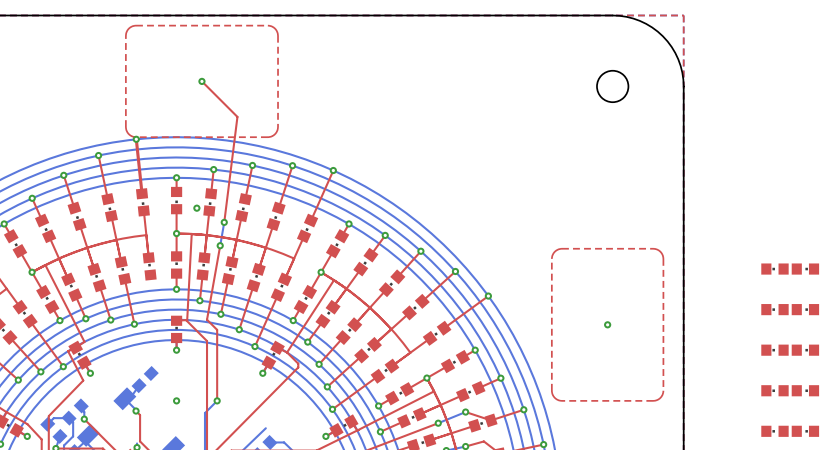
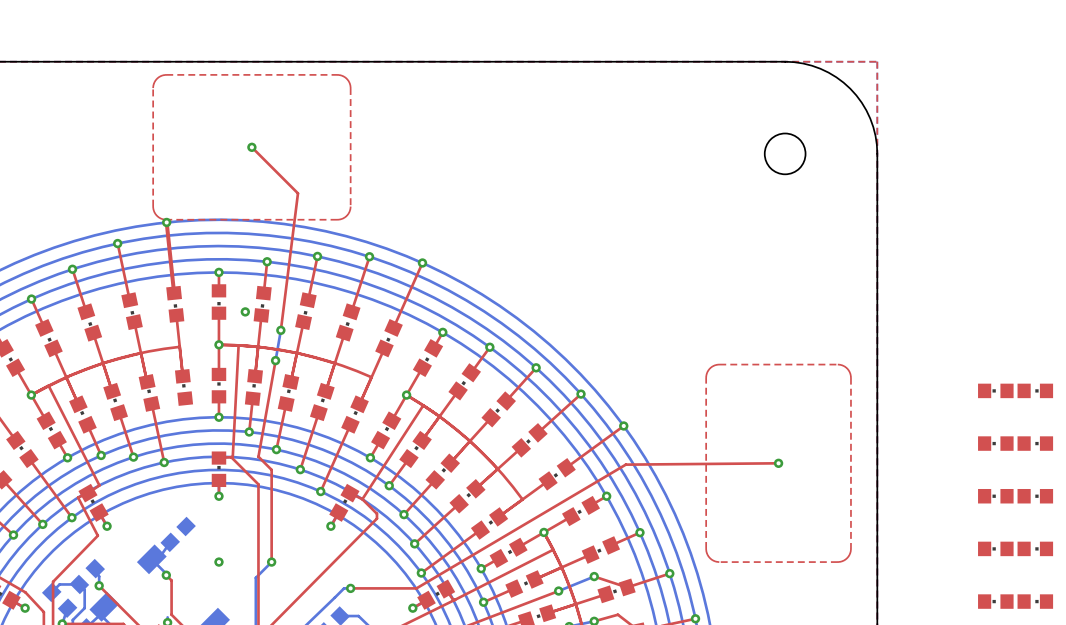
top track: none -> (778, 463) (625, 464) (416, 588) (350, 588)
bottom track: none -> (350, 588) (344, 588) (334, 597)
via: none -> (350, 588)

